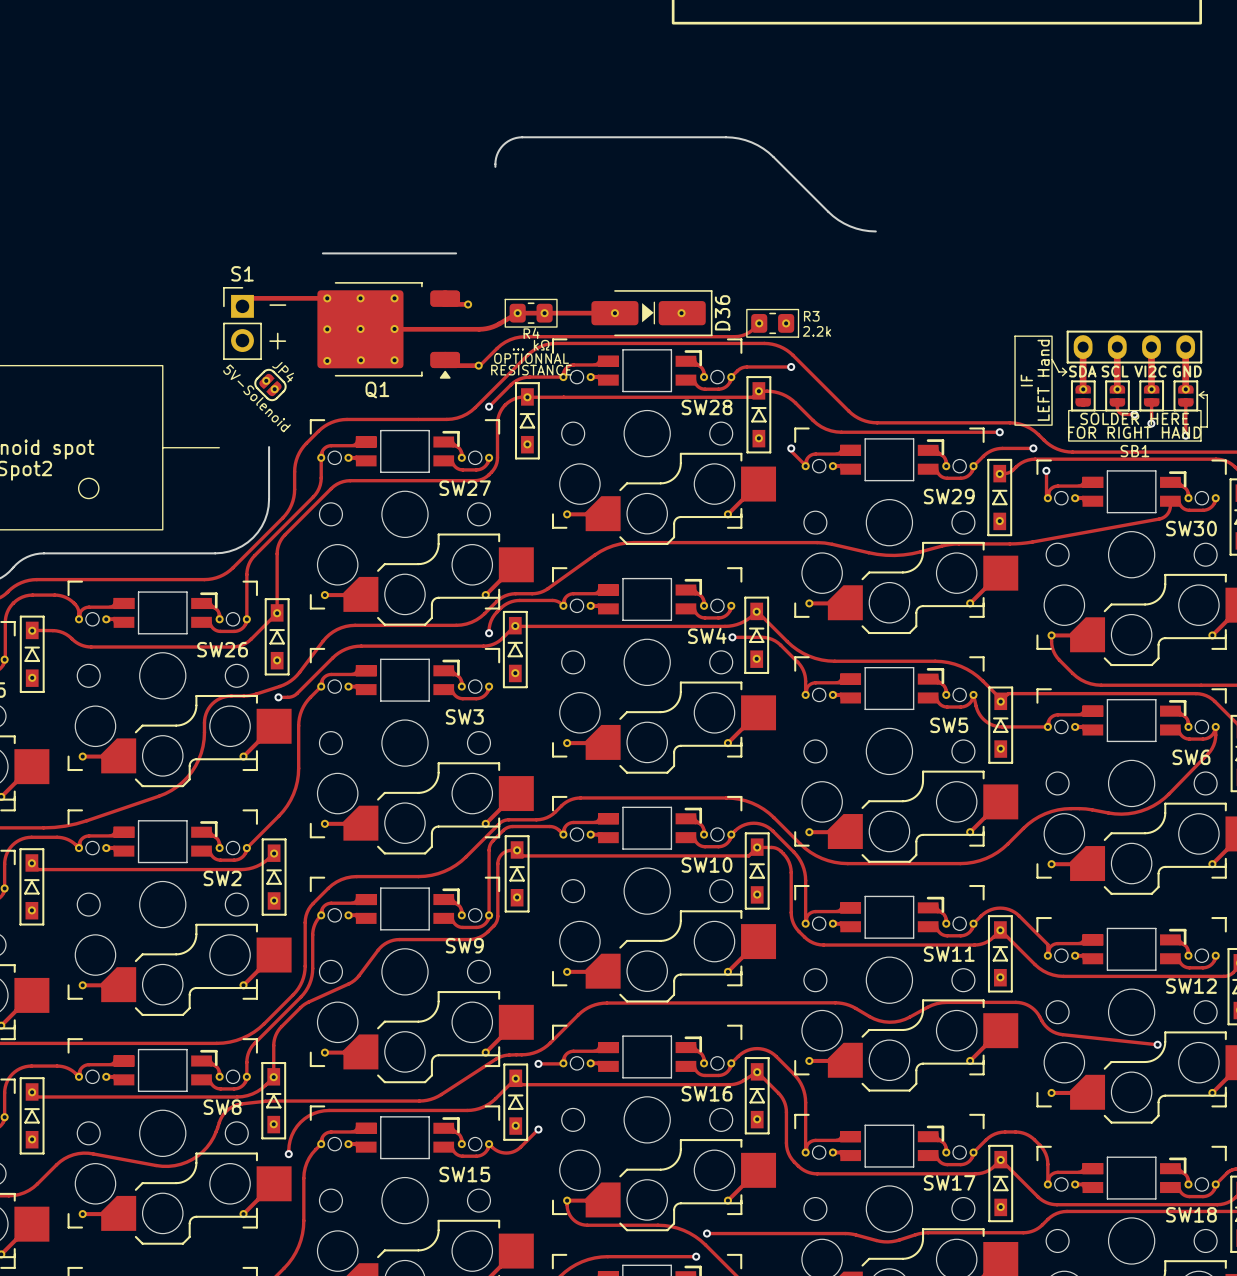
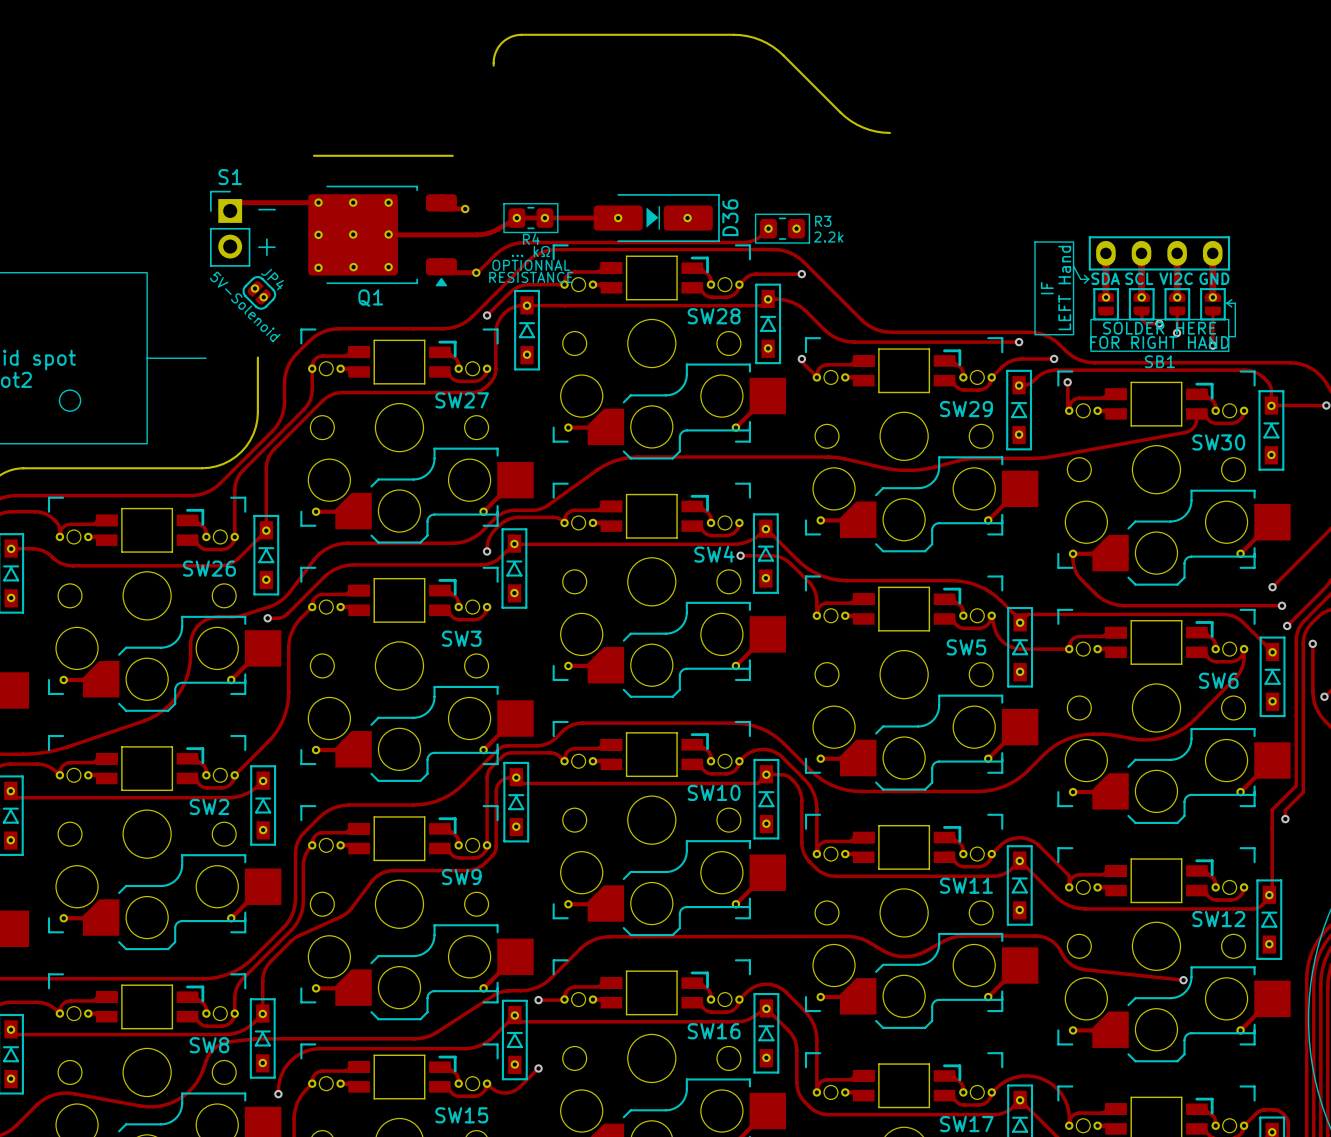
track: (973, 1152) (994, 1134) (1015, 1131) (1025, 1134) (1039, 1145) (1045, 1154) (1047, 1180) -> none
track: none -> (992, 1092) (1003, 1082) (1018, 1076) (1033, 1076) (1043, 1079) (1052, 1084) (1062, 1096) (1068, 1110) (1068, 1125)

